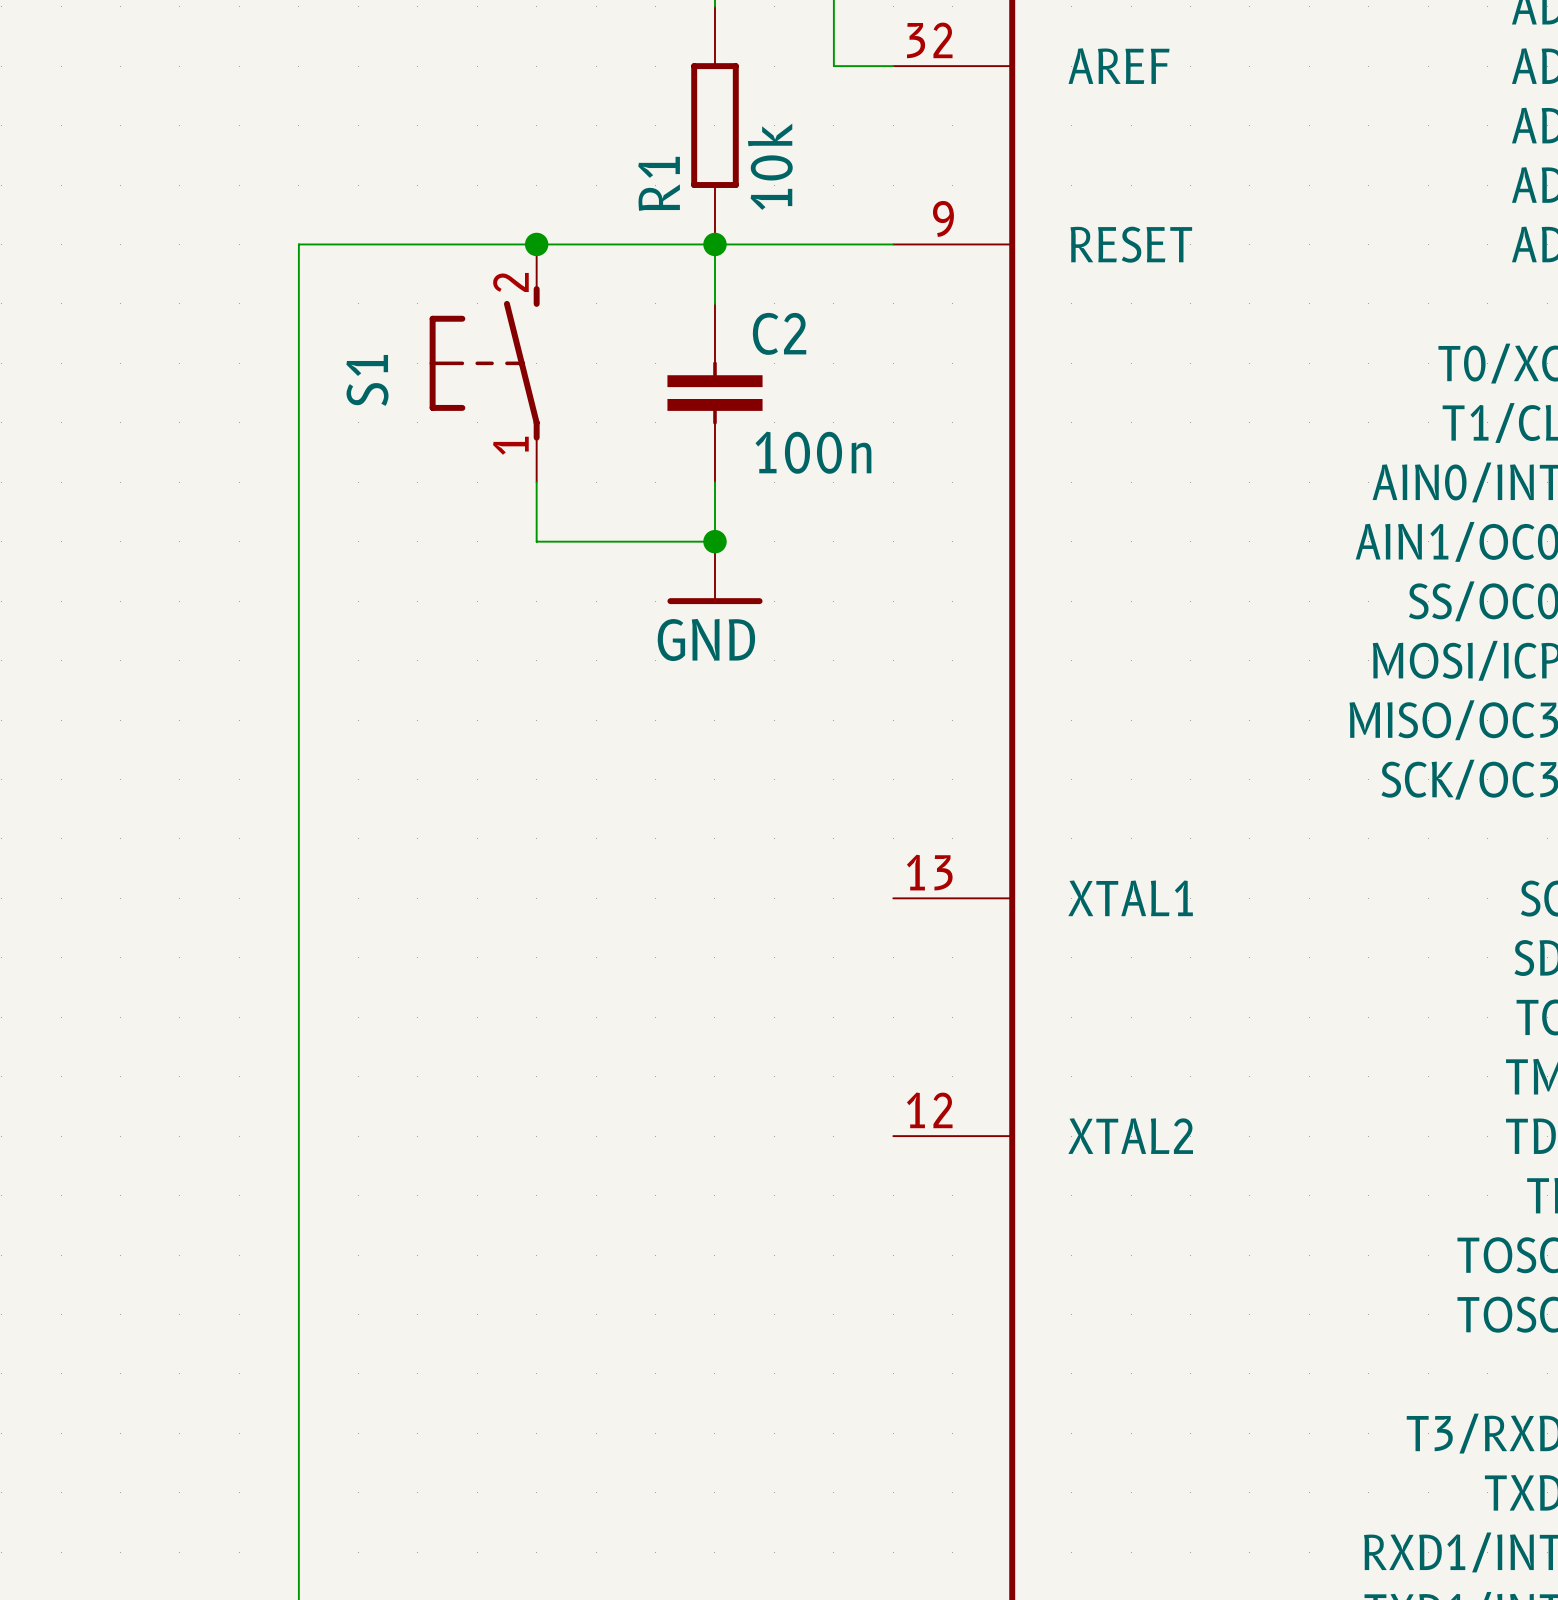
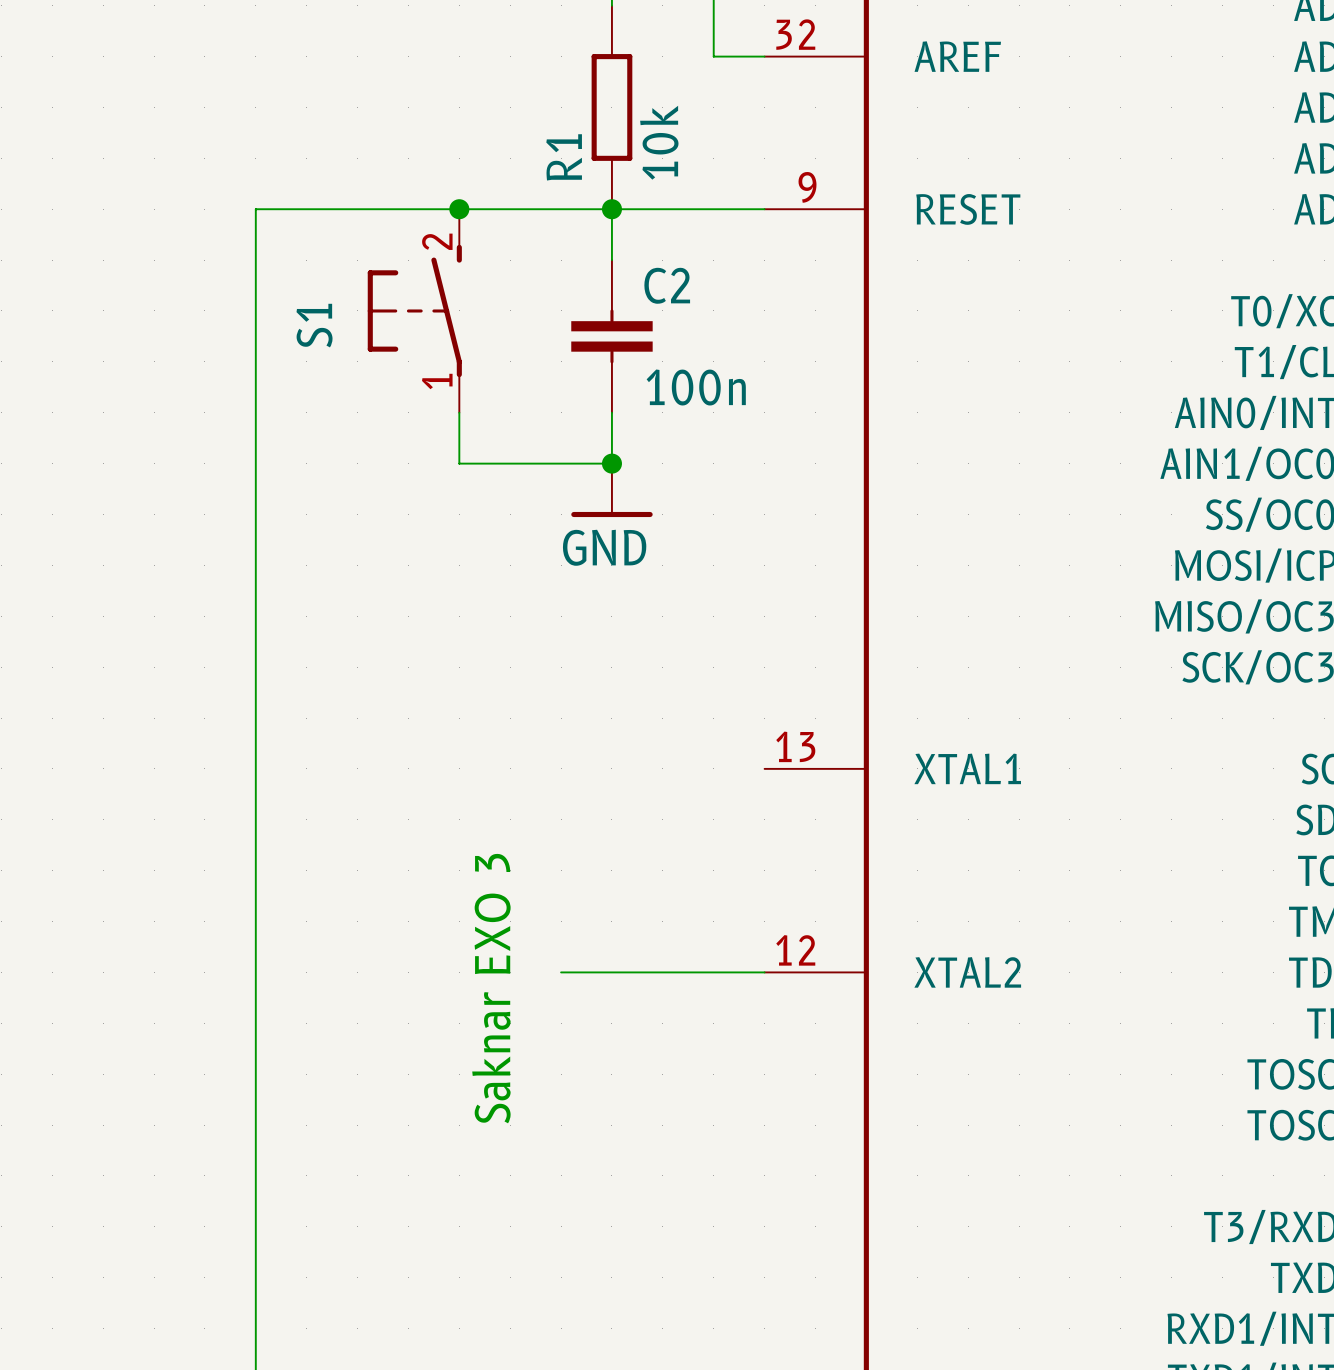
wire: none -> (561, 972) (764, 972)
text: none -> Saknar EXO 3 (491, 988)

